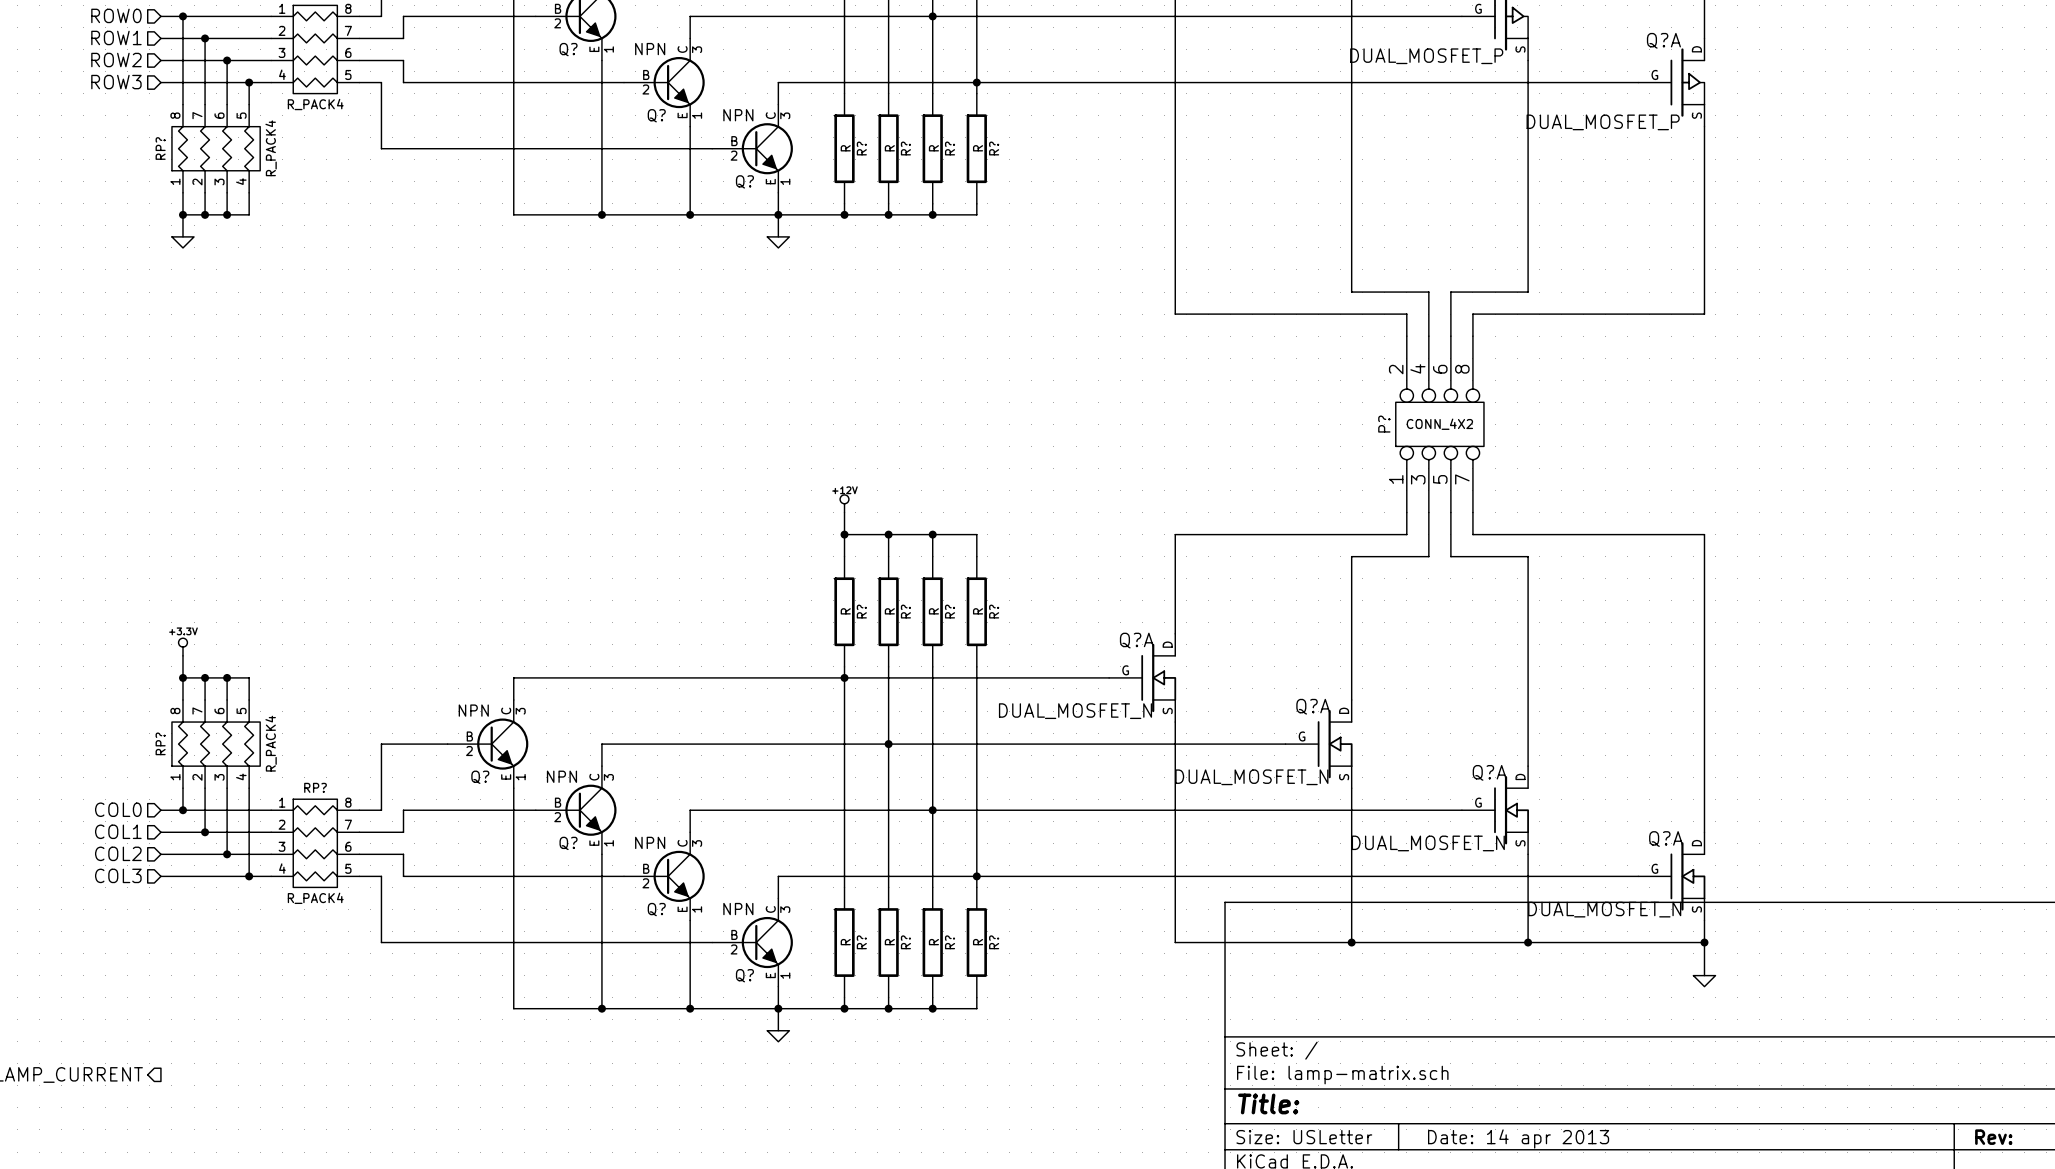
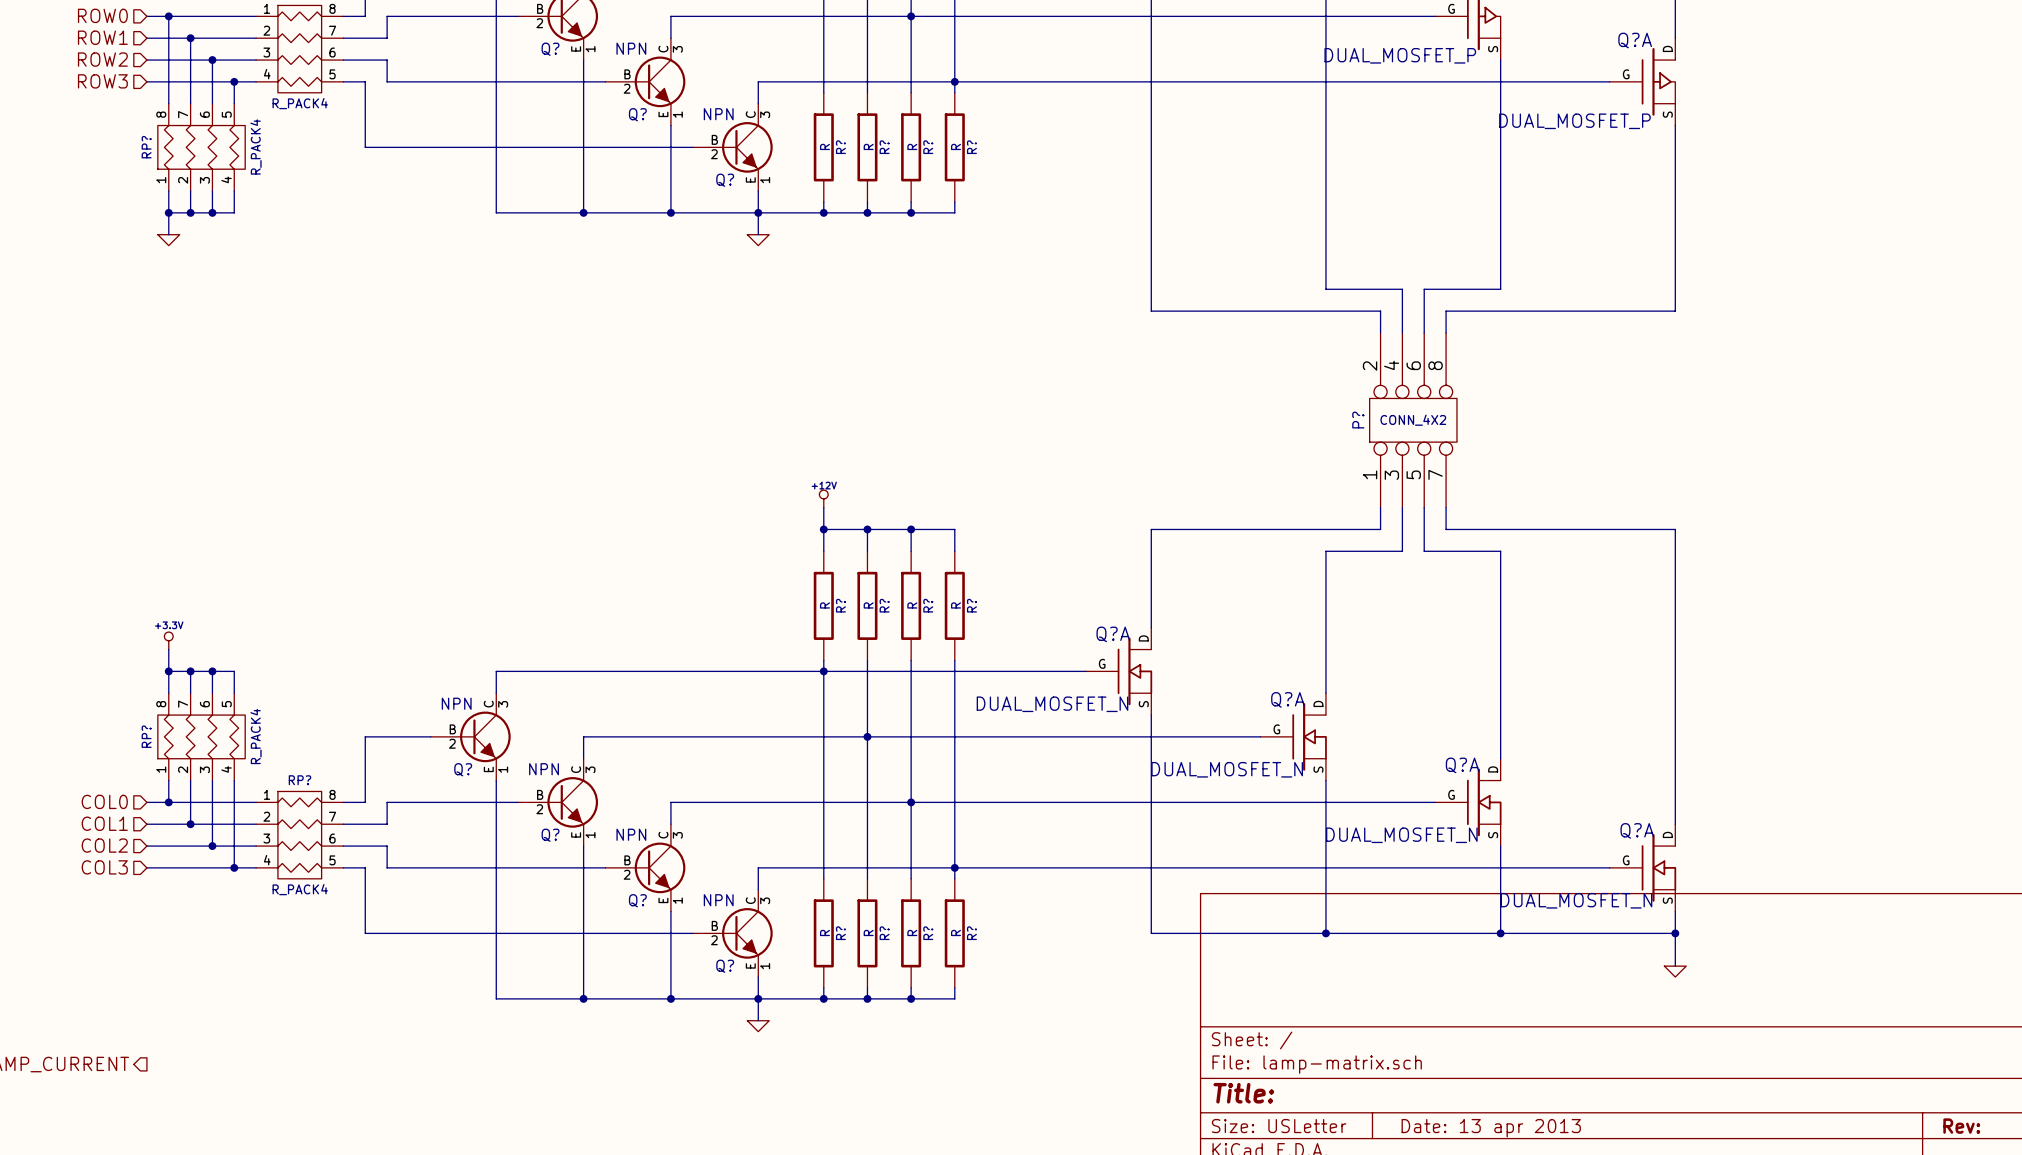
title block: Date: 14 apr 2013 (1518, 1138) -> Date: 13 apr 2013 (1491, 1128)

